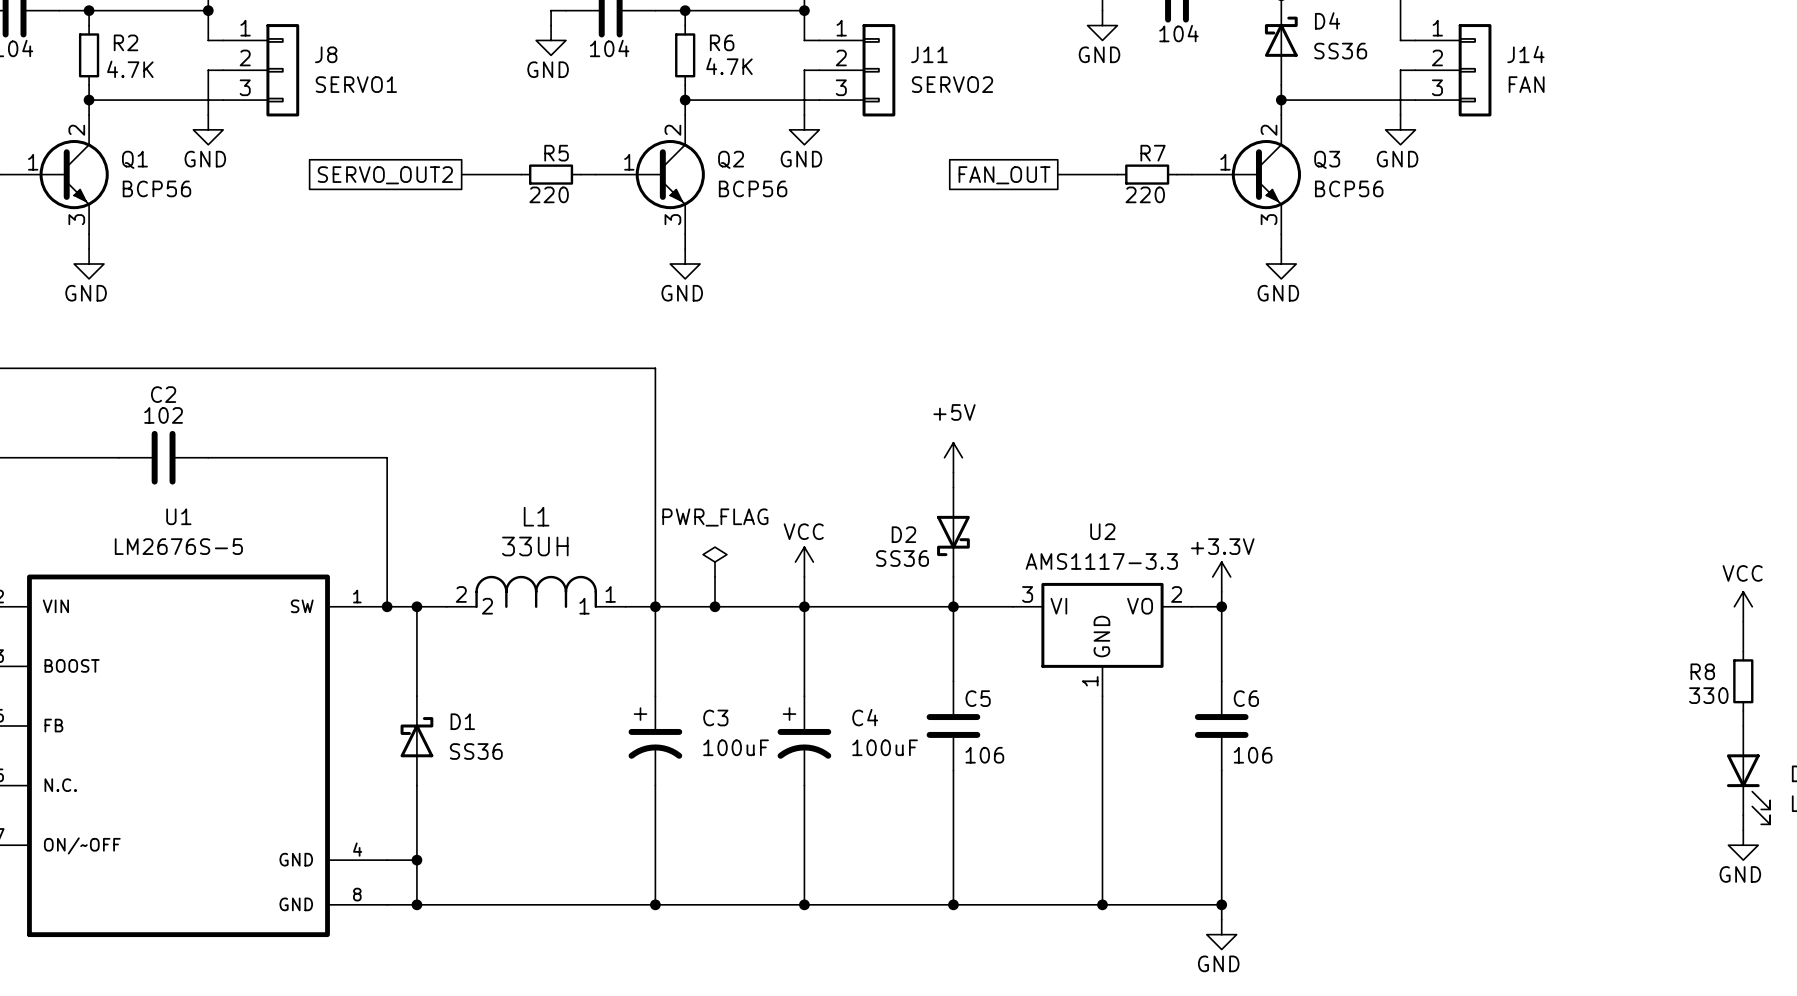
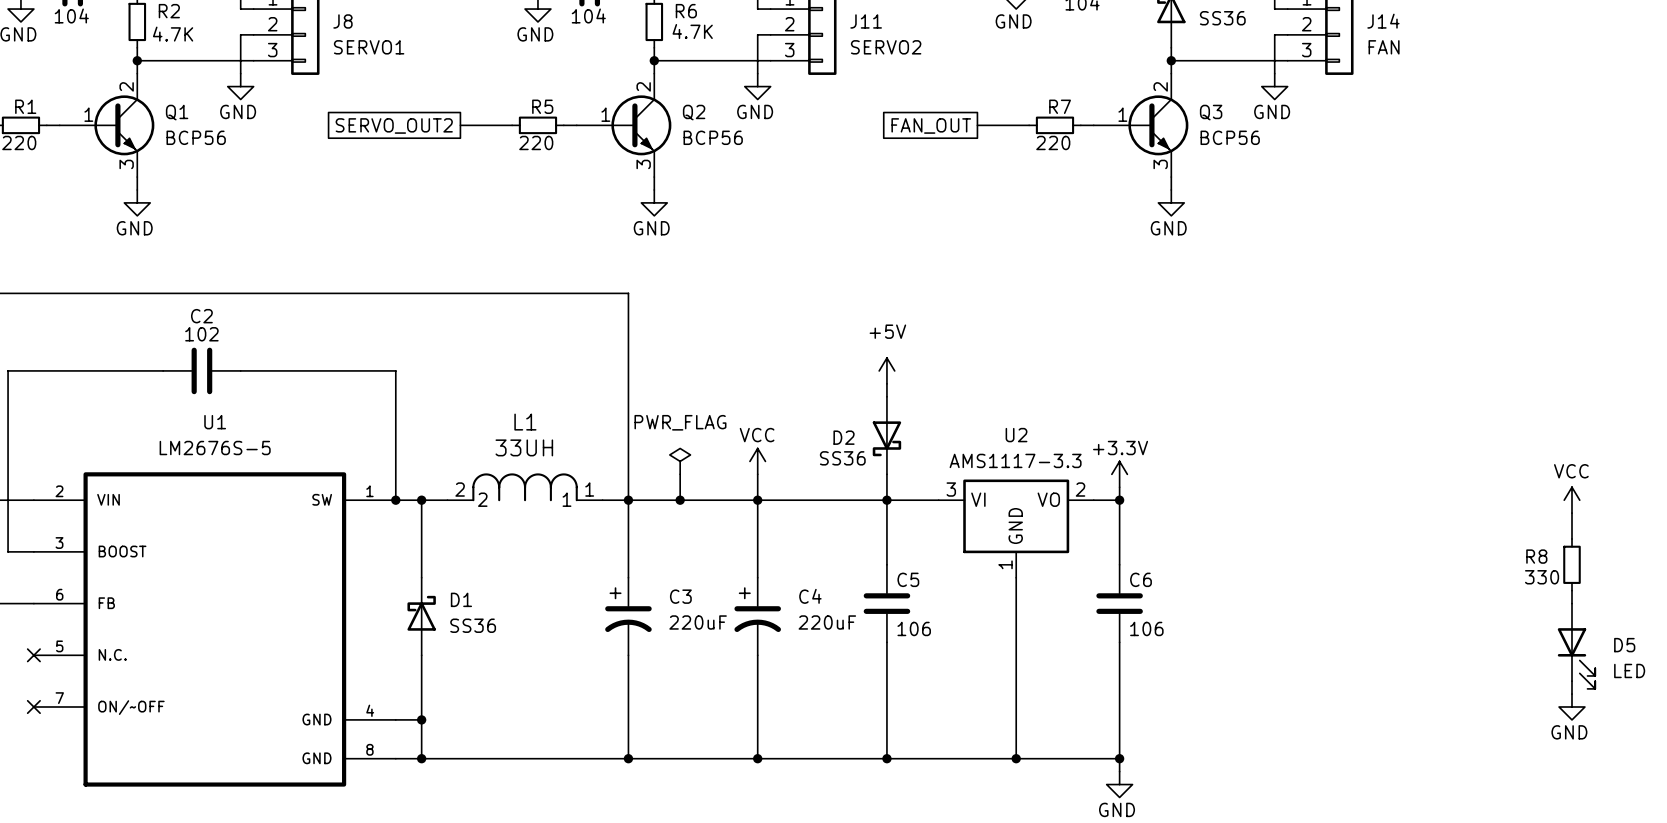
C3 value: 100uF (736, 747) -> 220uF (698, 622)
C4 value: 100uF (885, 747) -> 220uF (827, 622)

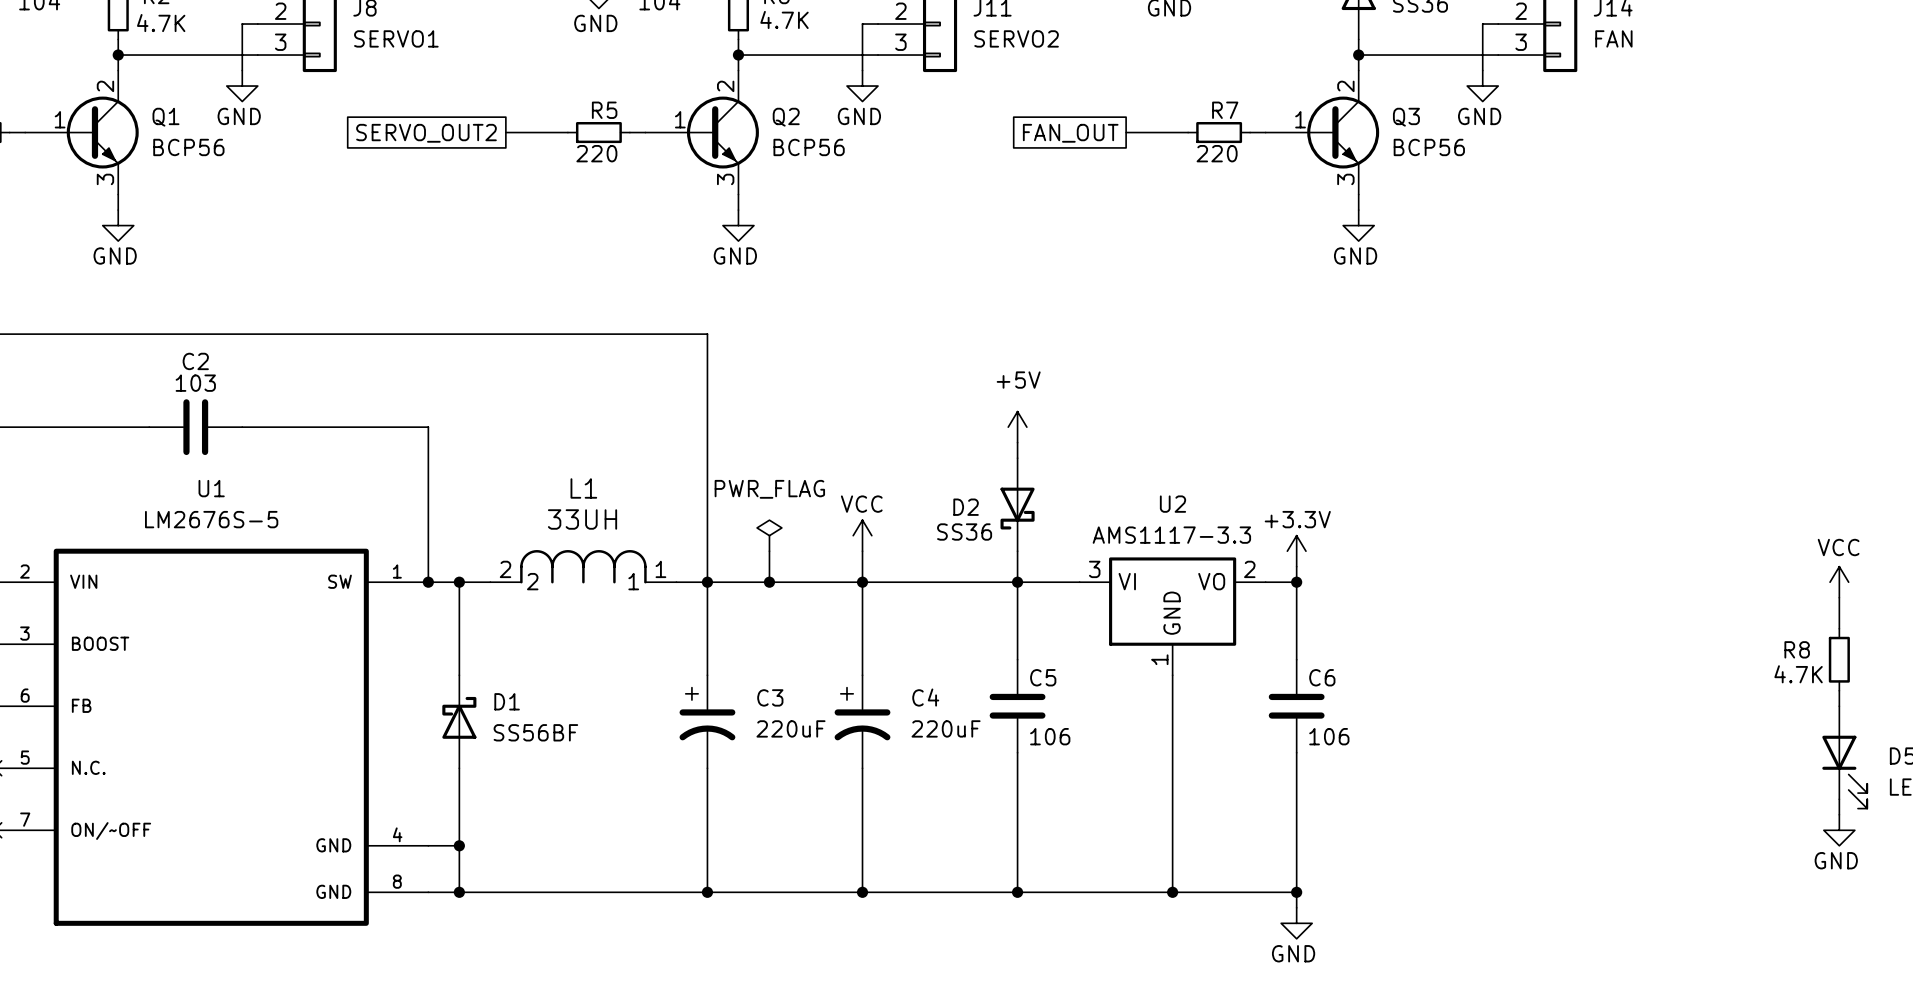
C2 value: 102 (201, 334) -> 103 (195, 383)
R8 value: 330 (1542, 577) -> 4.7K (1798, 674)
D1 value: SS36 (473, 625) -> SS56BF (535, 732)

